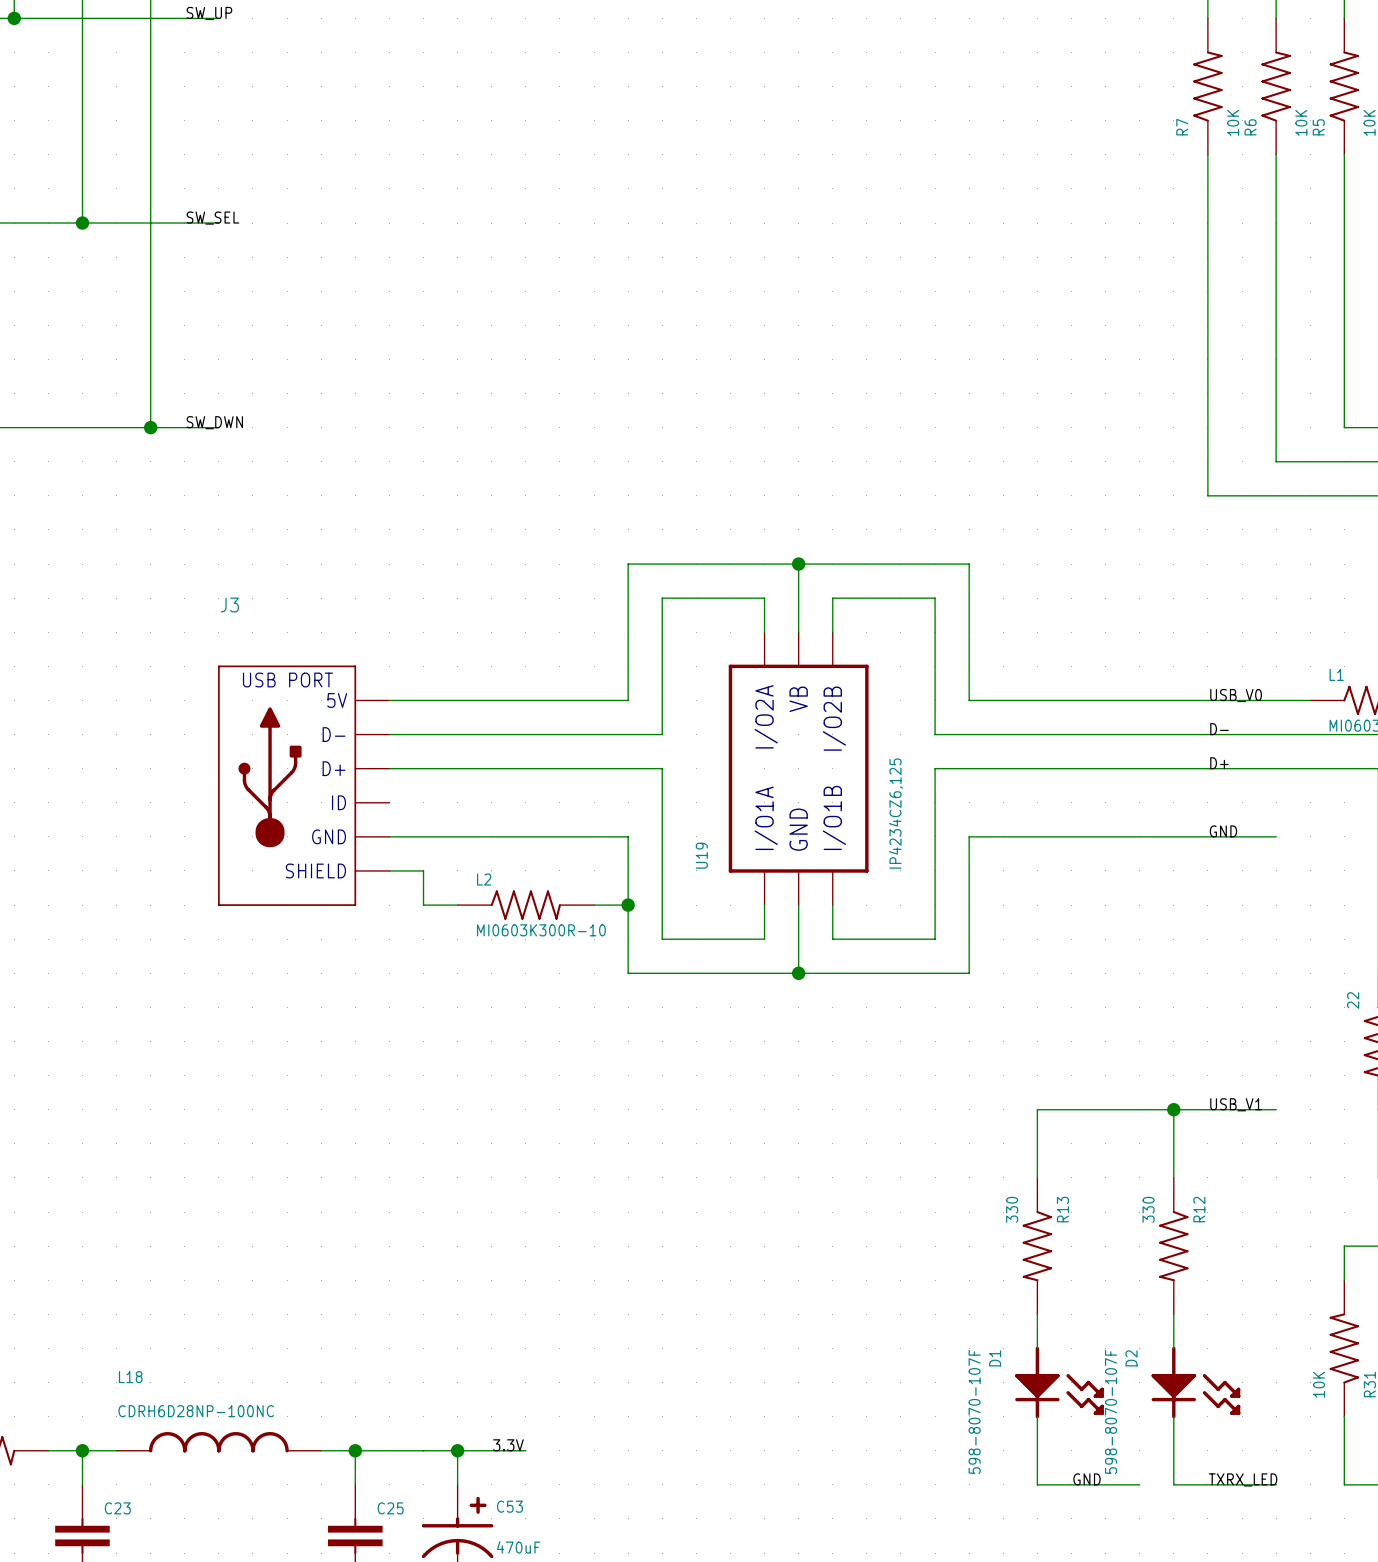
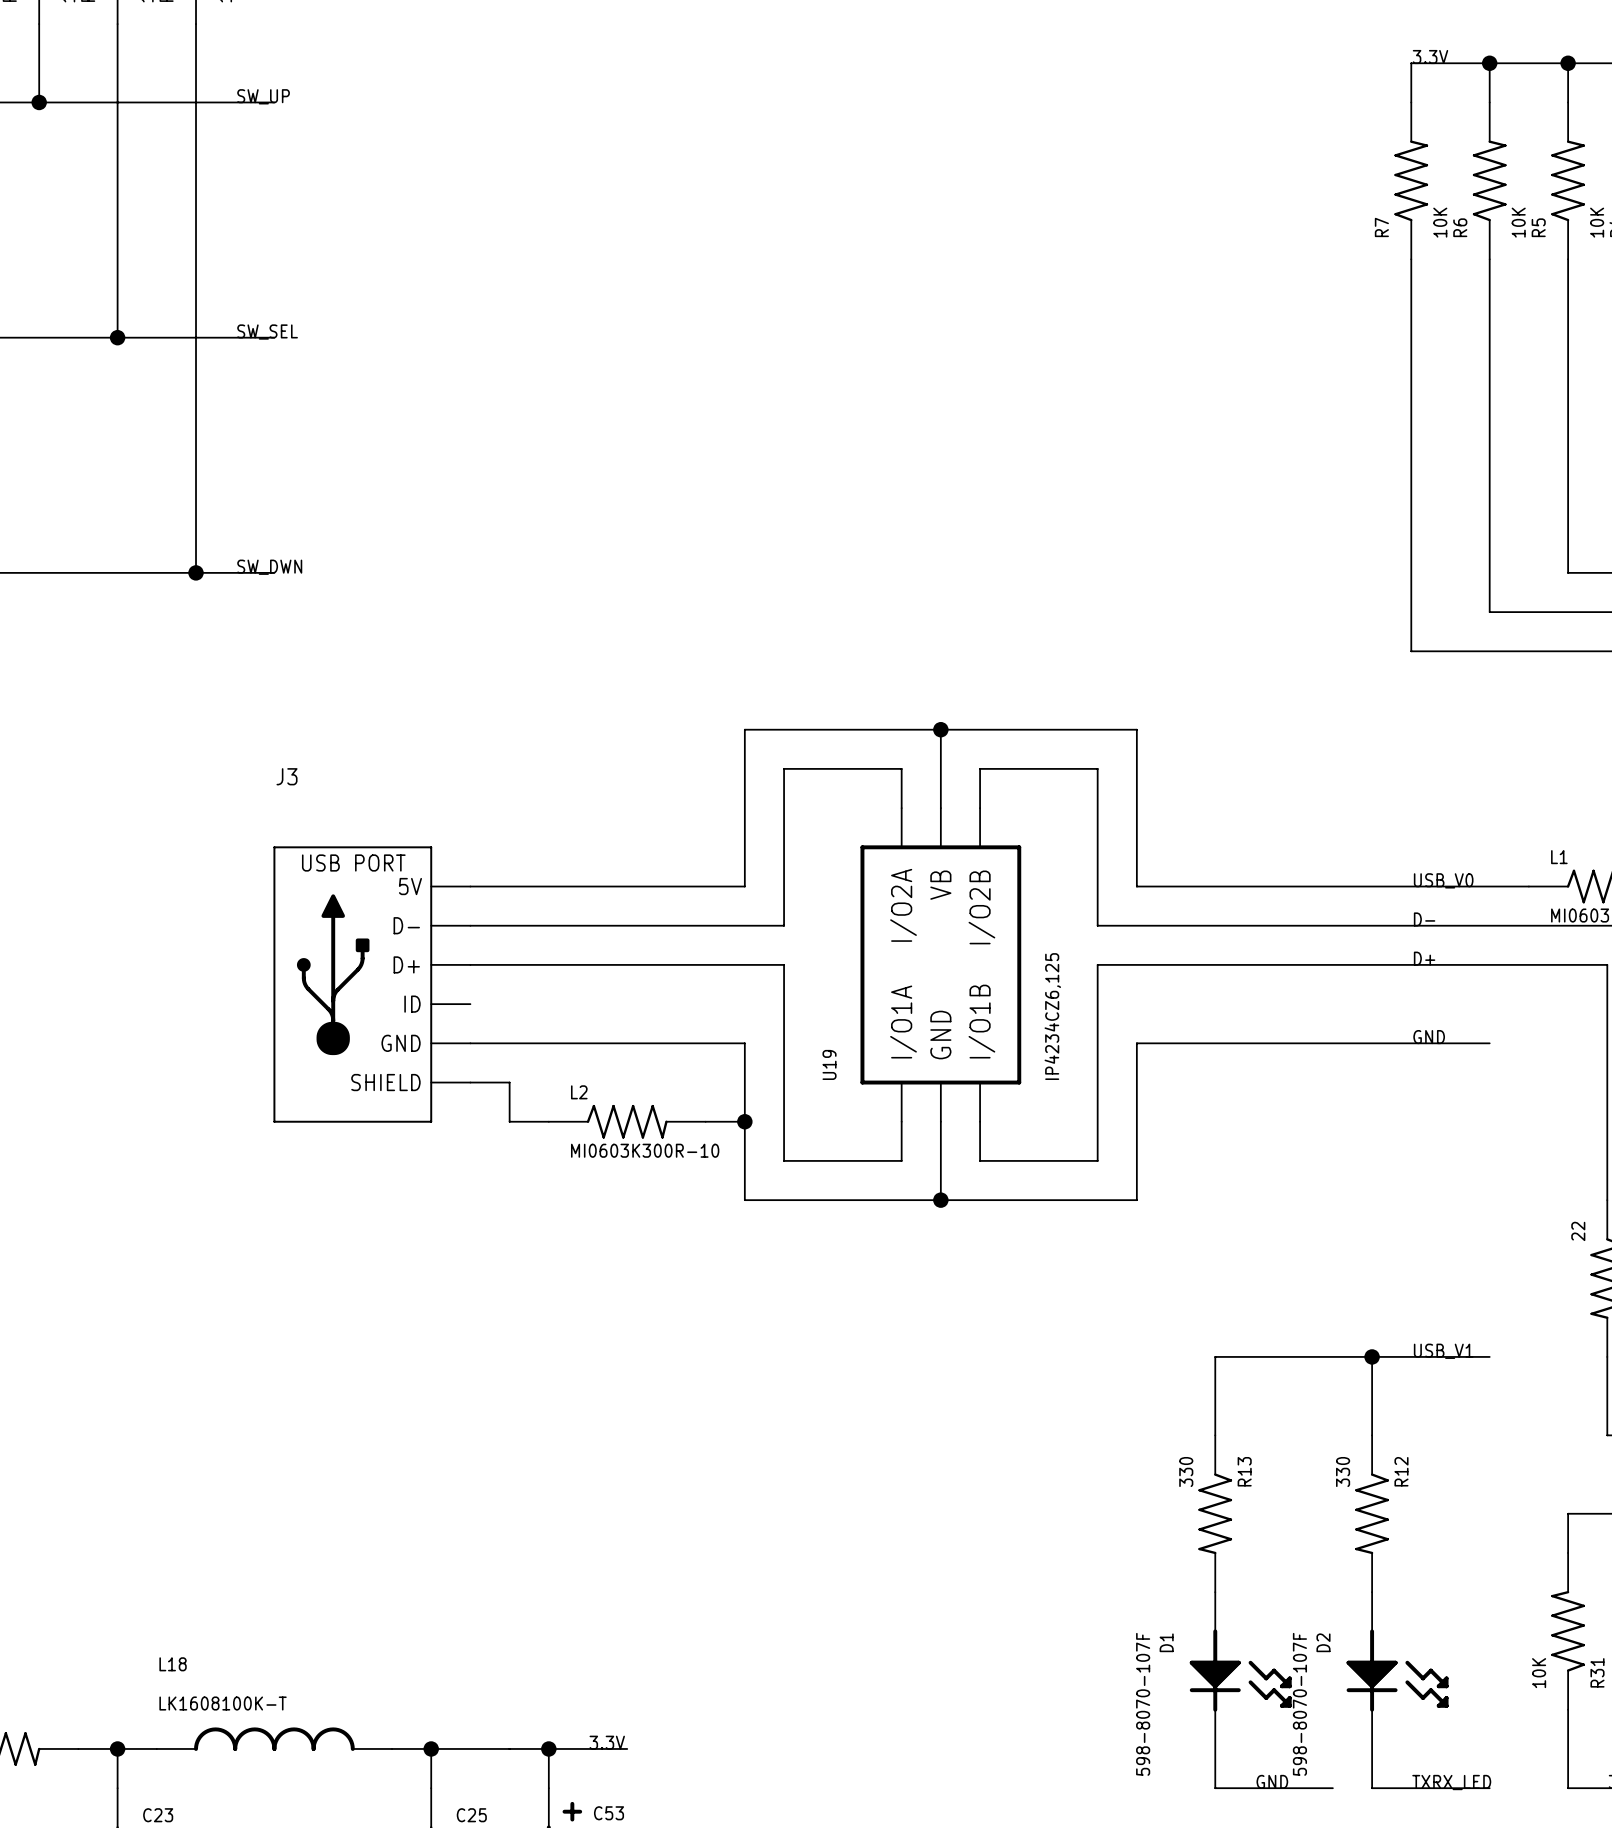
L18 value: CDRH6D28NP-100NC (196, 1411) -> LK1608100K-T (223, 1703)

